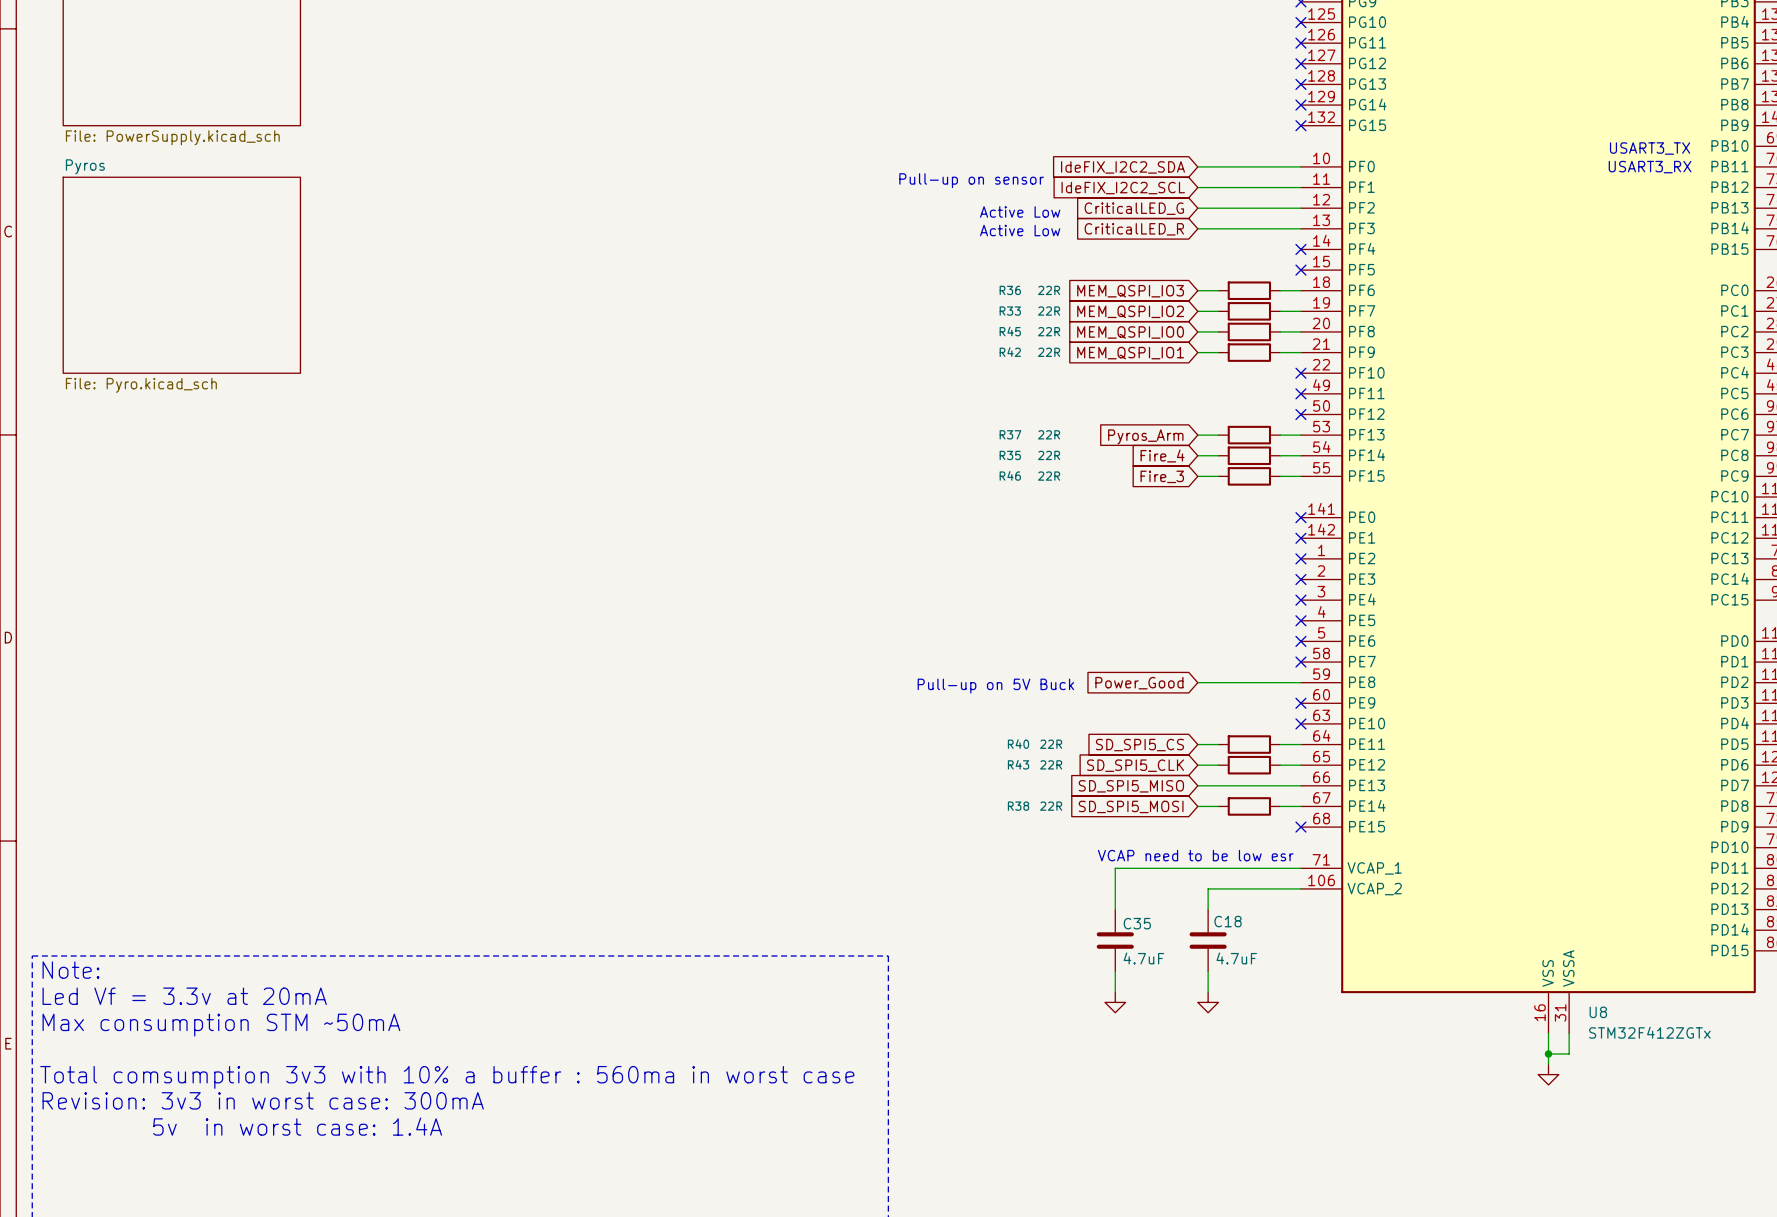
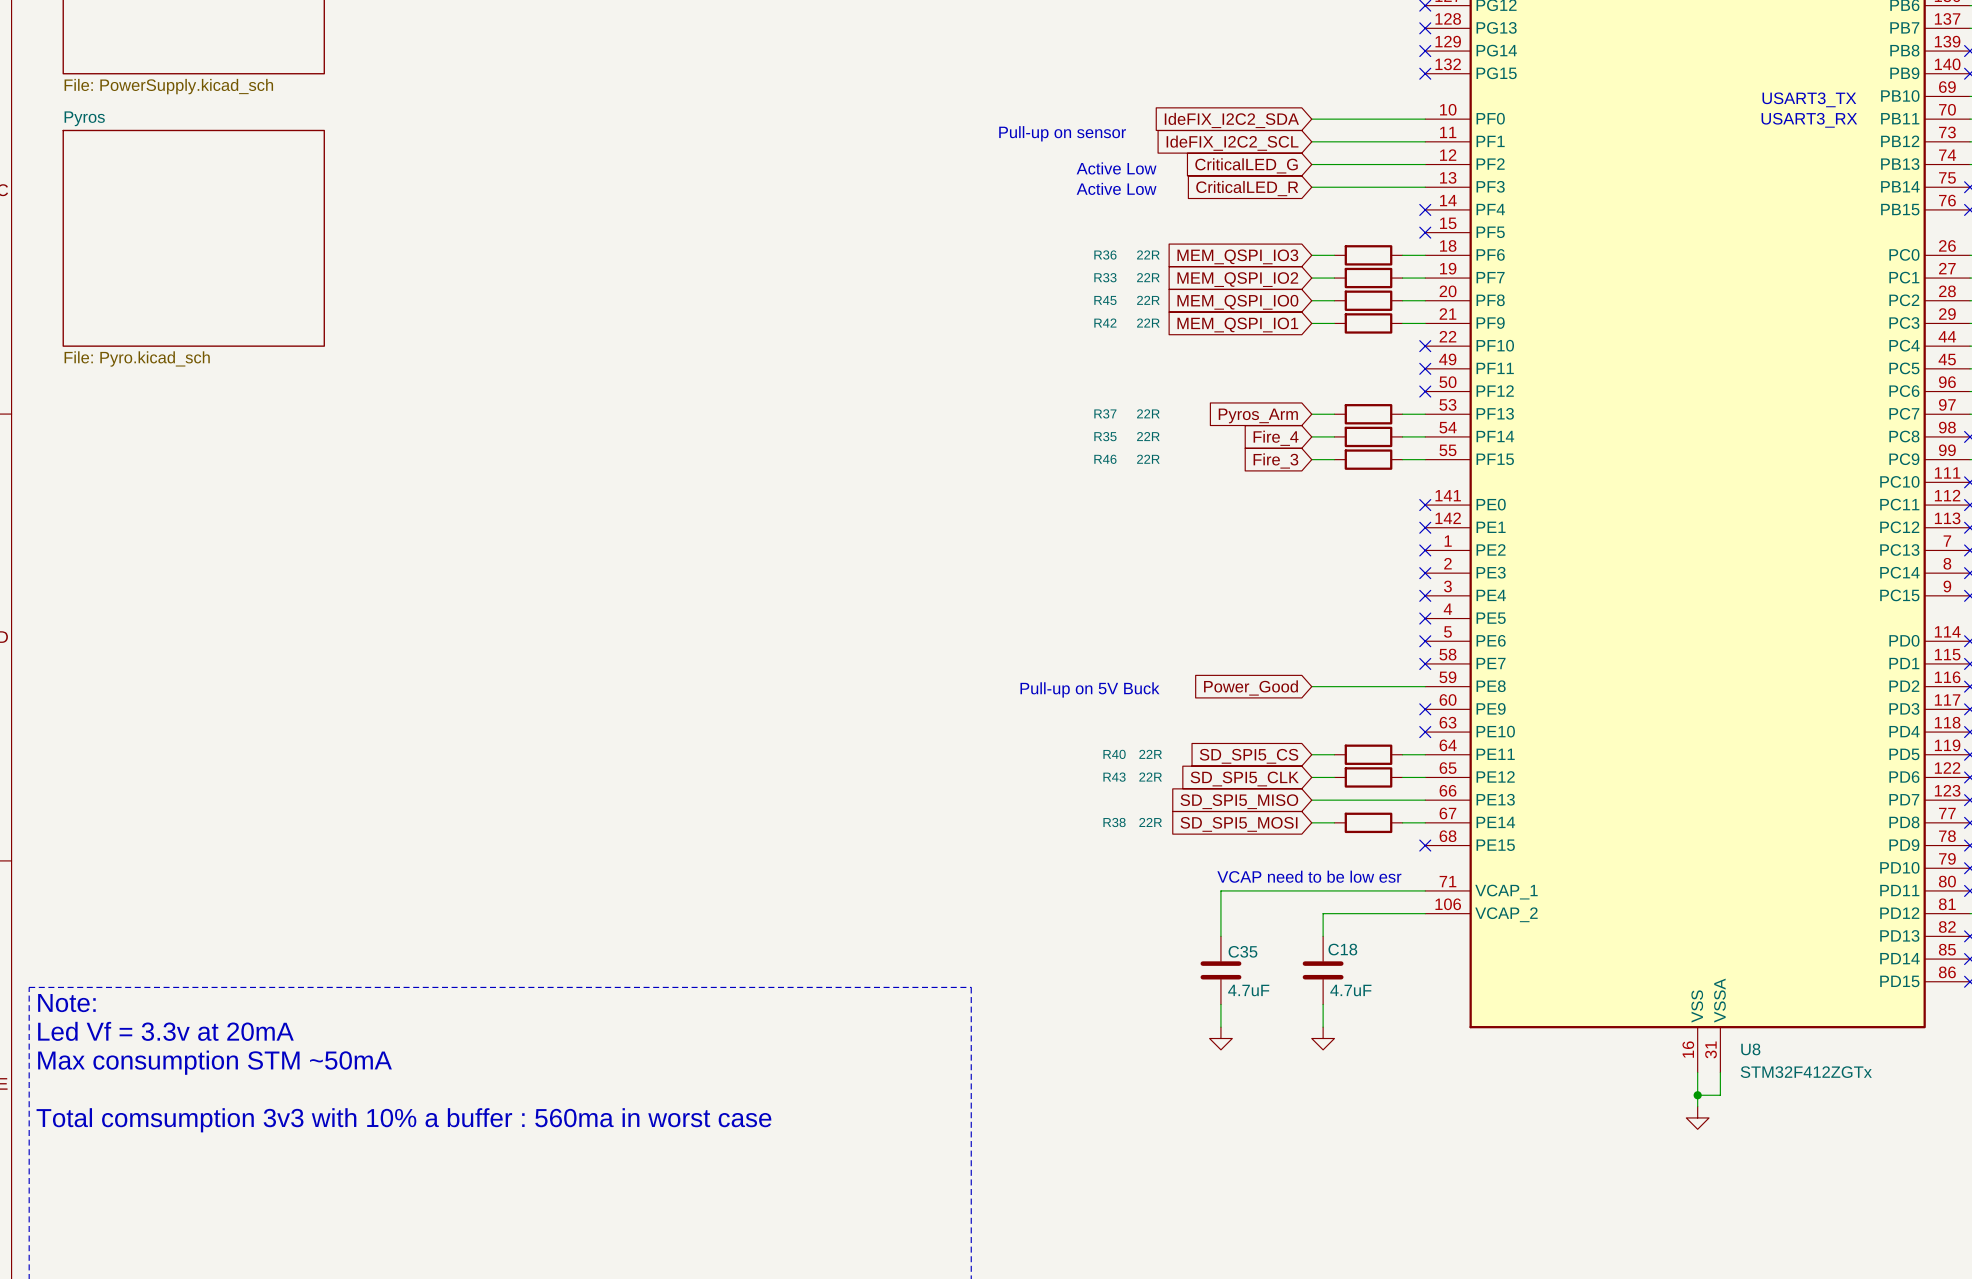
text: Revision: 3v3 in worst case: 300mA (263, 1100) -> none
text: 5v in worst case: 1.4A (297, 1126) -> none

